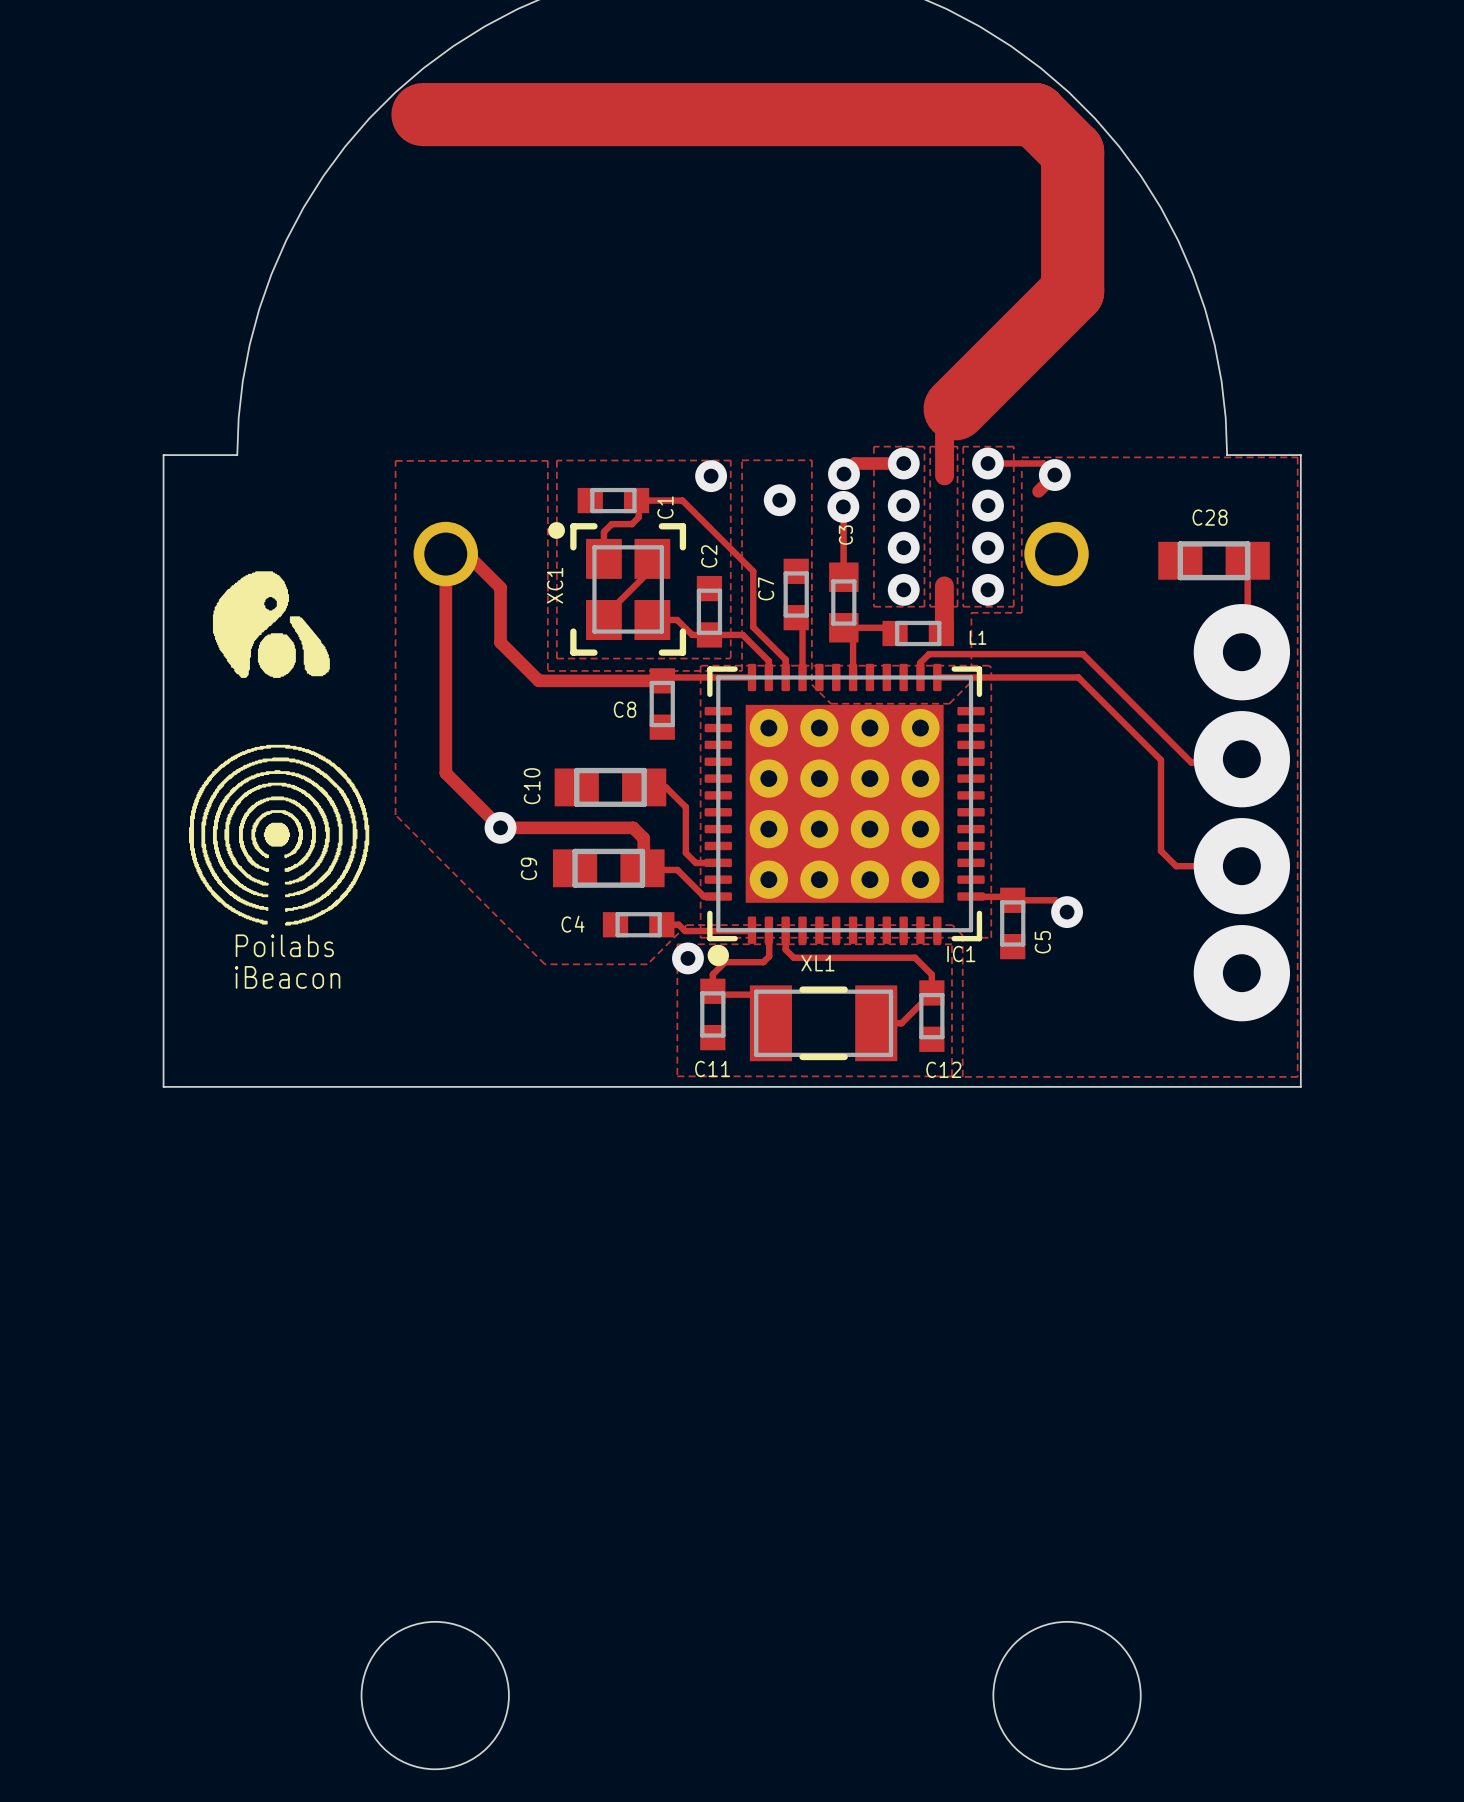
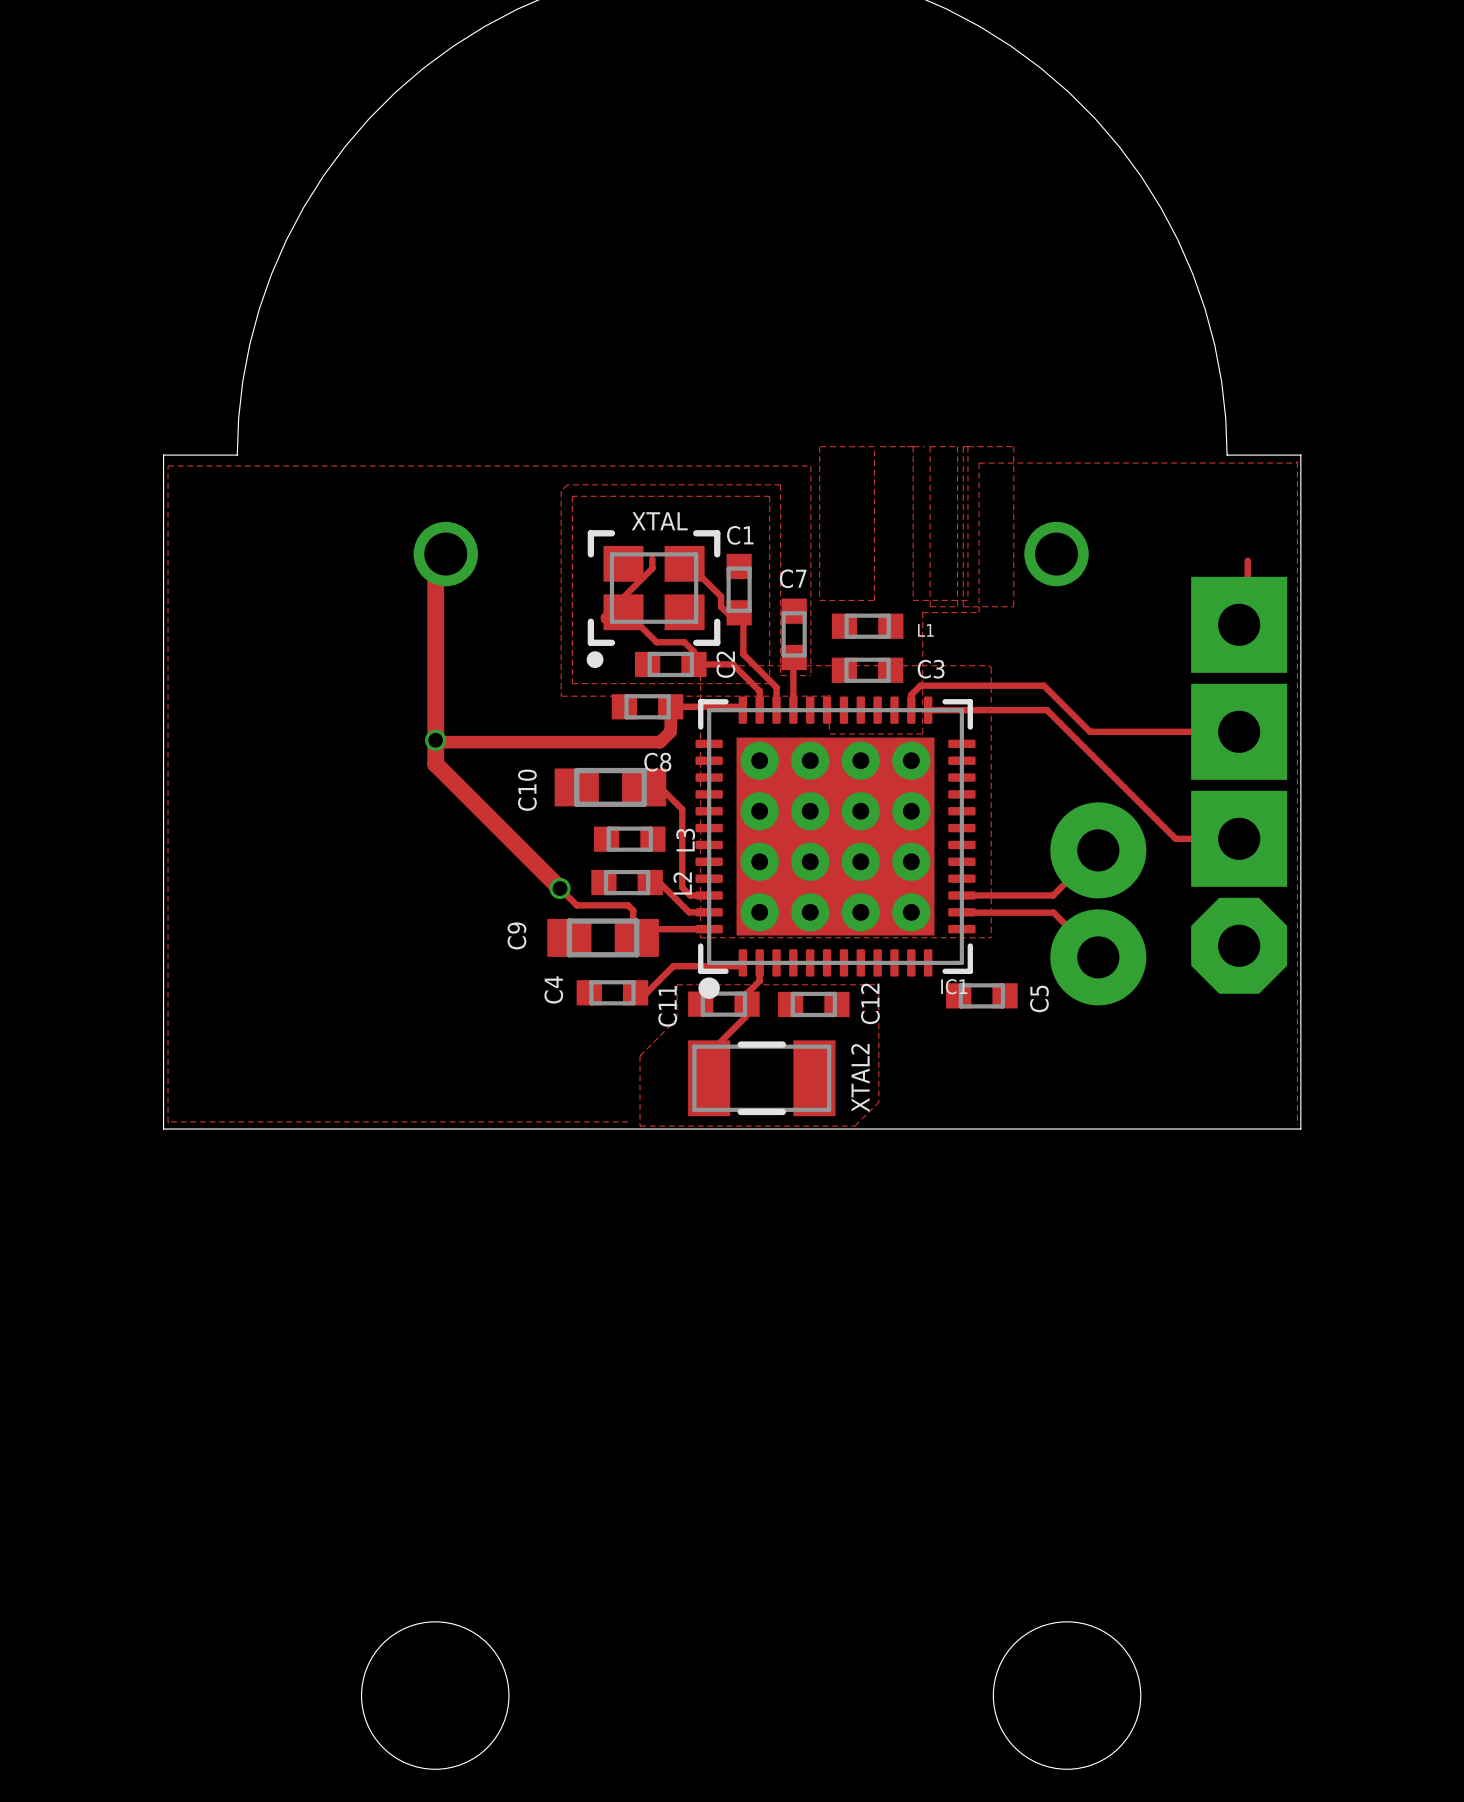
track: (422, 114) (1034, 114) (1072, 152) (1072, 291) (955, 408) -> none
track: (944, 419) (944, 475) -> none
zone outline: (873, 446) (873, 606) (924, 606) (924, 446) -> none
zone outline: (874, 446) (880, 446) -> (874, 446) (874, 600) (819, 600) (819, 446) (873, 446)
zone outline: none -> (913, 446) (913, 600) (967, 600) (967, 446)
zone outline: (556, 460) (730, 460) (729, 658) (556, 658) (556, 460) -> (572, 496) (572, 683) (769, 683) (769, 496) (572, 496)
track: (903, 463) (854, 463) (843, 474) -> none
via: (903, 463) -> none
track: (988, 463) (1043, 463) (1054, 475) (1038, 491) -> none
via: (988, 463) -> none
via: (843, 474) -> none
via: (1054, 475) -> none
via: (711, 476) -> none
C1 rotation: 0° (613, 500) -> 90° clockwise (739, 589)
C1 position: (613, 500) -> (739, 589)
via: (779, 500) -> none
via: (903, 505) -> none
via: (988, 505) -> none
via: (843, 506) -> none
track: (843, 507) (843, 576) -> none
C3 name position: C3 (845, 535) -> C3 (931, 669)
via: (903, 547) -> none
via: (988, 547) -> none
track: none -> (435, 554) (435, 764) (576, 905) (628, 905) (633, 910) (633, 934) (636, 937) (645, 929) (709, 929)
track: (603, 558) (603, 531) (611, 524) (631, 524) (638, 517) (638, 502) (636, 500) (682, 500) (753, 571) (753, 627) (785, 659) (785, 677) -> none
C28: (1214, 560) -> none
C3 footprint: [829, 562, 859, 643] -> [831, 657, 904, 683]
track: none -> (684, 563) (688, 563) (721, 596) (721, 606) (729, 615) (743, 615) (743, 654) (776, 687) (776, 710)
drawing: [213, 571, 330, 678] -> none
track: (948, 581) (944, 585) (944, 630) (941, 633) -> none
XC1: (617, 588) -> none
C7 name rotation: 0° (766, 588) -> 90° clockwise (793, 578)
via: (903, 589) -> none
via: (988, 589) -> none
C7 position: (796, 594) -> (794, 634)
XTAL: none -> (653, 599)
C2 rotation: 0° (709, 611) -> 90° clockwise (670, 664)
C2 position: (709, 611) -> (670, 664)
track: none -> (623, 612) (626, 612) (656, 642) (684, 642) (693, 651) (693, 664) (732, 664) (759, 691) (759, 710)
zone outline: (971, 612) (971, 681) (949, 703) (830, 703) (811, 684) (811, 460) (742, 460) (742, 670) (547, 670) (547, 460) (395, 460) (395, 814) (544, 964) (647, 964) (686, 925) (952, 925) (962, 935) (962, 1076) (1297, 1076) (1297, 457) (1021, 457) (1021, 612) (979, 612) -> (971, 612) (922, 612) (922, 734) (829, 734)
zone outline: none -> (979, 612) (979, 463) (1297, 461) (1297, 1125)
track: (796, 617) (802, 623) (802, 677) -> none
track: (652, 619) (677, 619) (692, 634) (742, 634) (768, 661) (768, 677) -> none
track: (895, 633) (889, 627) (843, 627) (853, 637) (853, 677) -> none
L1 position: (918, 633) -> (867, 626)
via: (1241, 652) -> none
track: none -> (794, 657) (793, 710)
track: (751, 677) (665, 677) (662, 680) (538, 680) (500, 642) (500, 587) (466, 554) (445, 554) (445, 773) (500, 827) (633, 827) (643, 838) (642, 868) -> none
track: (920, 677) (920, 662) (929, 654) (1082, 654) (1191, 762) (1238, 762) (1241, 759) -> none
track: (937, 677) (1078, 677) (1160, 760) (1160, 851) (1176, 866) (1241, 866) -> none
zone outline: none -> (561, 695) (561, 491) (567, 484) (780, 484) (780, 675) (810, 675) (810, 465) (168, 465) (168, 1122) (628, 1121)
zone outline: none -> (561, 696) (829, 695) (829, 733)
C8 rotation: 0° (662, 704) -> 90° clockwise (647, 706)
track: none -> (742, 710) (739, 706) (670, 706) (670, 731) (660, 742) (438, 742) (435, 738)
track: none -> (911, 710) (911, 694) (920, 685) (1043, 685) (1090, 731) (1239, 731)
track: none -> (928, 710) (1047, 710) (1175, 838) (1239, 838)
via: none -> (435, 740)
drawing: [189, 745, 369, 926] -> none
via: (1241, 759) -> none
track: none -> (640, 785) (658, 785) (682, 809) (682, 887) (690, 895) (709, 895)
part: none -> (1239, 785)
C10 name position: C10 (532, 786) -> C10 (527, 790)
track: (644, 787) (666, 787) (685, 807) (685, 853) (695, 863) (718, 863) -> none
IC1 position: (844, 814) -> (835, 847)
via: (500, 827) -> none
L3: none -> (629, 839)
track: none -> (1098, 850) (1053, 895) (961, 895)
via: (1241, 866) -> none
C9 name position: C9 (528, 868) -> C9 (516, 935)
C9 position: (608, 868) -> (603, 937)
track: (645, 869) (677, 869) (703, 896) (718, 896) -> none
L2: none -> (627, 882)
track: none -> (650, 882) (659, 882) (689, 912) (709, 912)
via: none -> (560, 888)
track: (971, 896) (1009, 896) (1012, 900) (1055, 900) (1067, 912) -> none
part: none -> (1098, 903)
track: none -> (962, 912) (1053, 912) (1098, 957)
via: (1067, 912) -> none
C5 rotation: 0° (1012, 923) -> 90° clockwise (981, 995)
C5 position: (1012, 923) -> (981, 995)
C4 name rotation: 0° (573, 924) -> 90° counterclockwise (553, 989)
C4 position: (638, 924) -> (612, 992)
track: (661, 924) (678, 924) (685, 931) (751, 930) -> none
track: (769, 930) (769, 956) (763, 962) (725, 962) (712, 974) (712, 991) (716, 994) (751, 994) (770, 1013) (770, 1023) -> none
track: (785, 930) (785, 949) (793, 957) (915, 957) (931, 974) (931, 992) (901, 1023) (876, 1023) -> none
zone outline: (677, 944) (677, 1076) (951, 1076) (951, 944) (677, 944) -> none
text: Poilabs (284, 945) -> none
via: (687, 958) -> none
track: none -> (742, 962) (739, 966) (673, 966) (646, 992) (635, 992)
track: none -> (759, 962) (759, 980) (747, 993) (745, 1017) (704, 1057)
via: (1241, 973) -> none
text: iBeacon (287, 977) -> none
zone outline: none -> (677, 984) (677, 1018) (640, 1055) (640, 1126) (854, 1126) (878, 1102) (878, 984) (677, 984)
C11 rotation: 0° (712, 1014) -> 90° clockwise (723, 1004)
C12 rotation: 0° (931, 1016) -> 90° clockwise (813, 1004)
C12 position: (931, 1016) -> (813, 1004)
XL1: (823, 1023) -> none
XTAL2: none -> (761, 1078)
board edge: (163, 1086) (1300, 1086) -> (163, 1086) (163, 1129) (1300, 1129) (1300, 1086)

